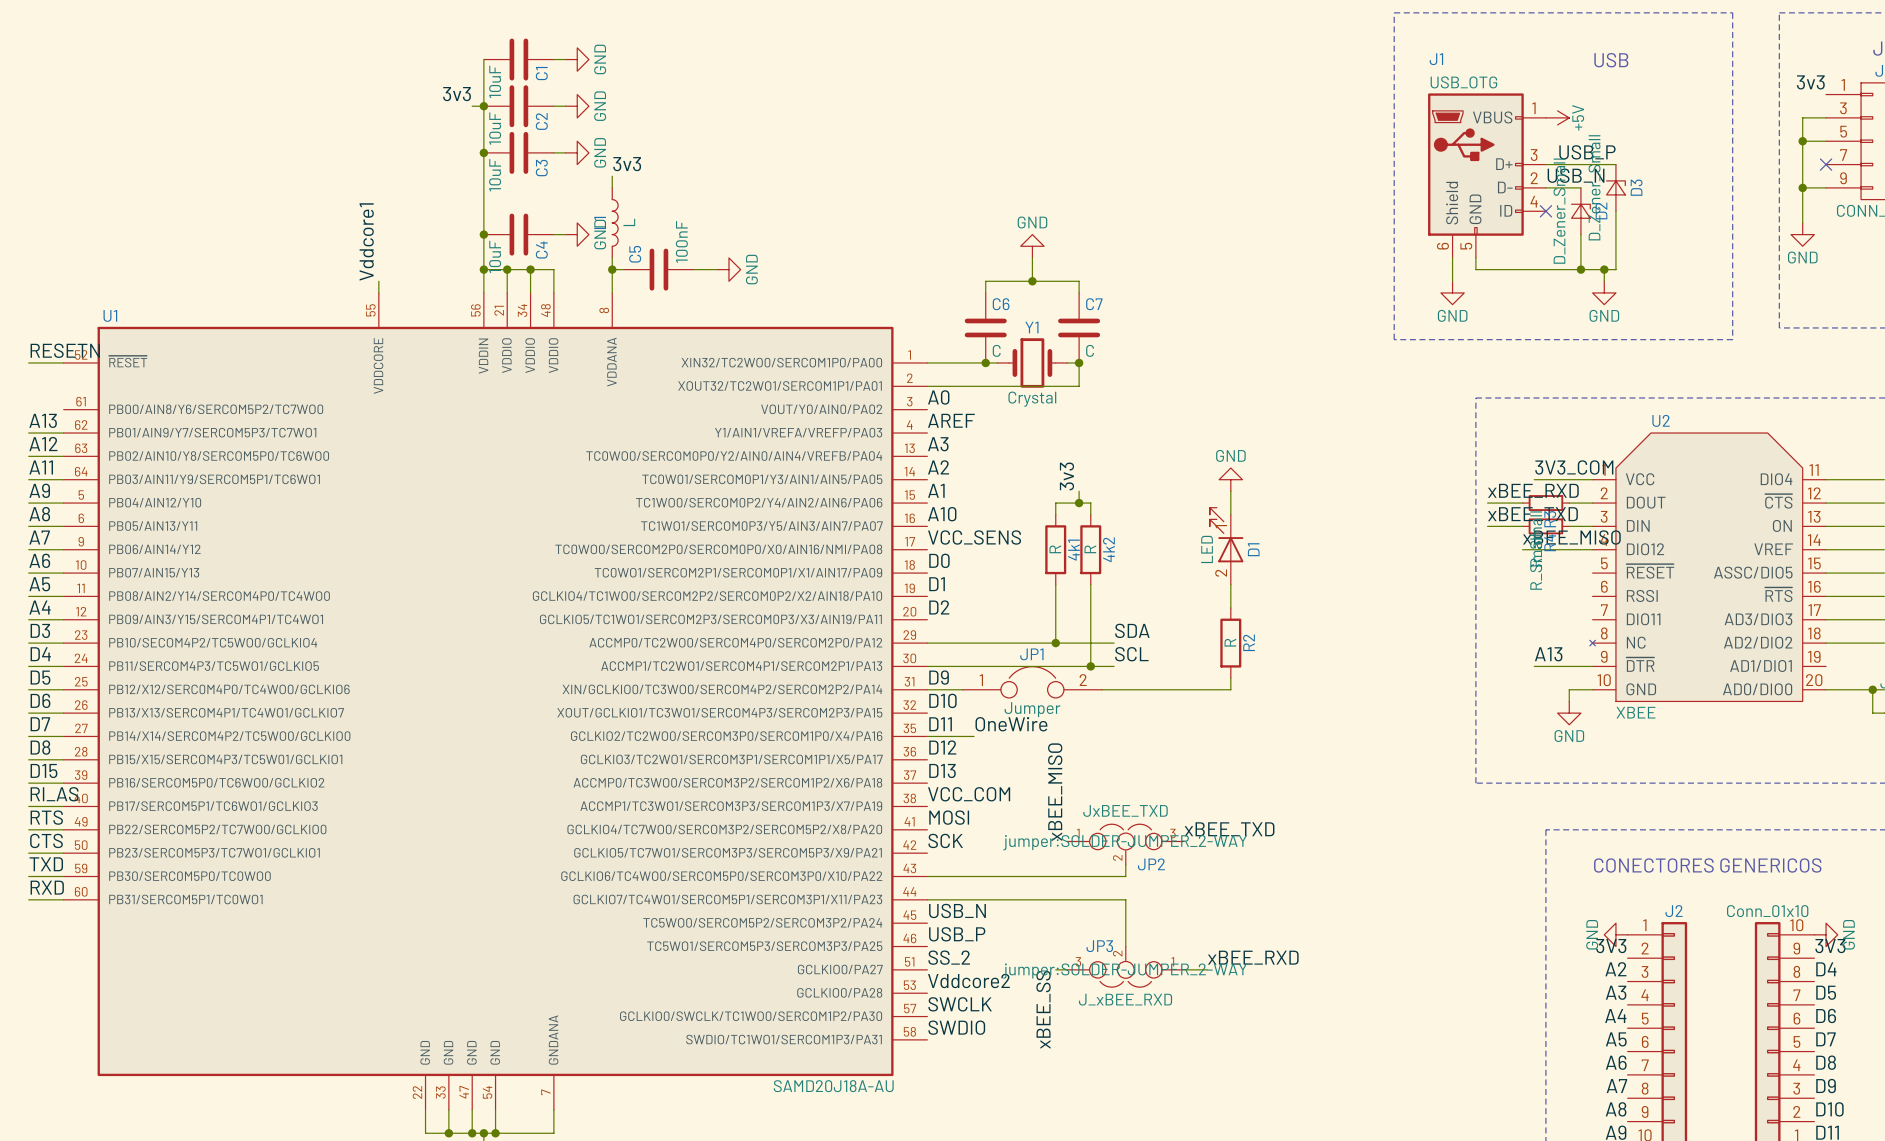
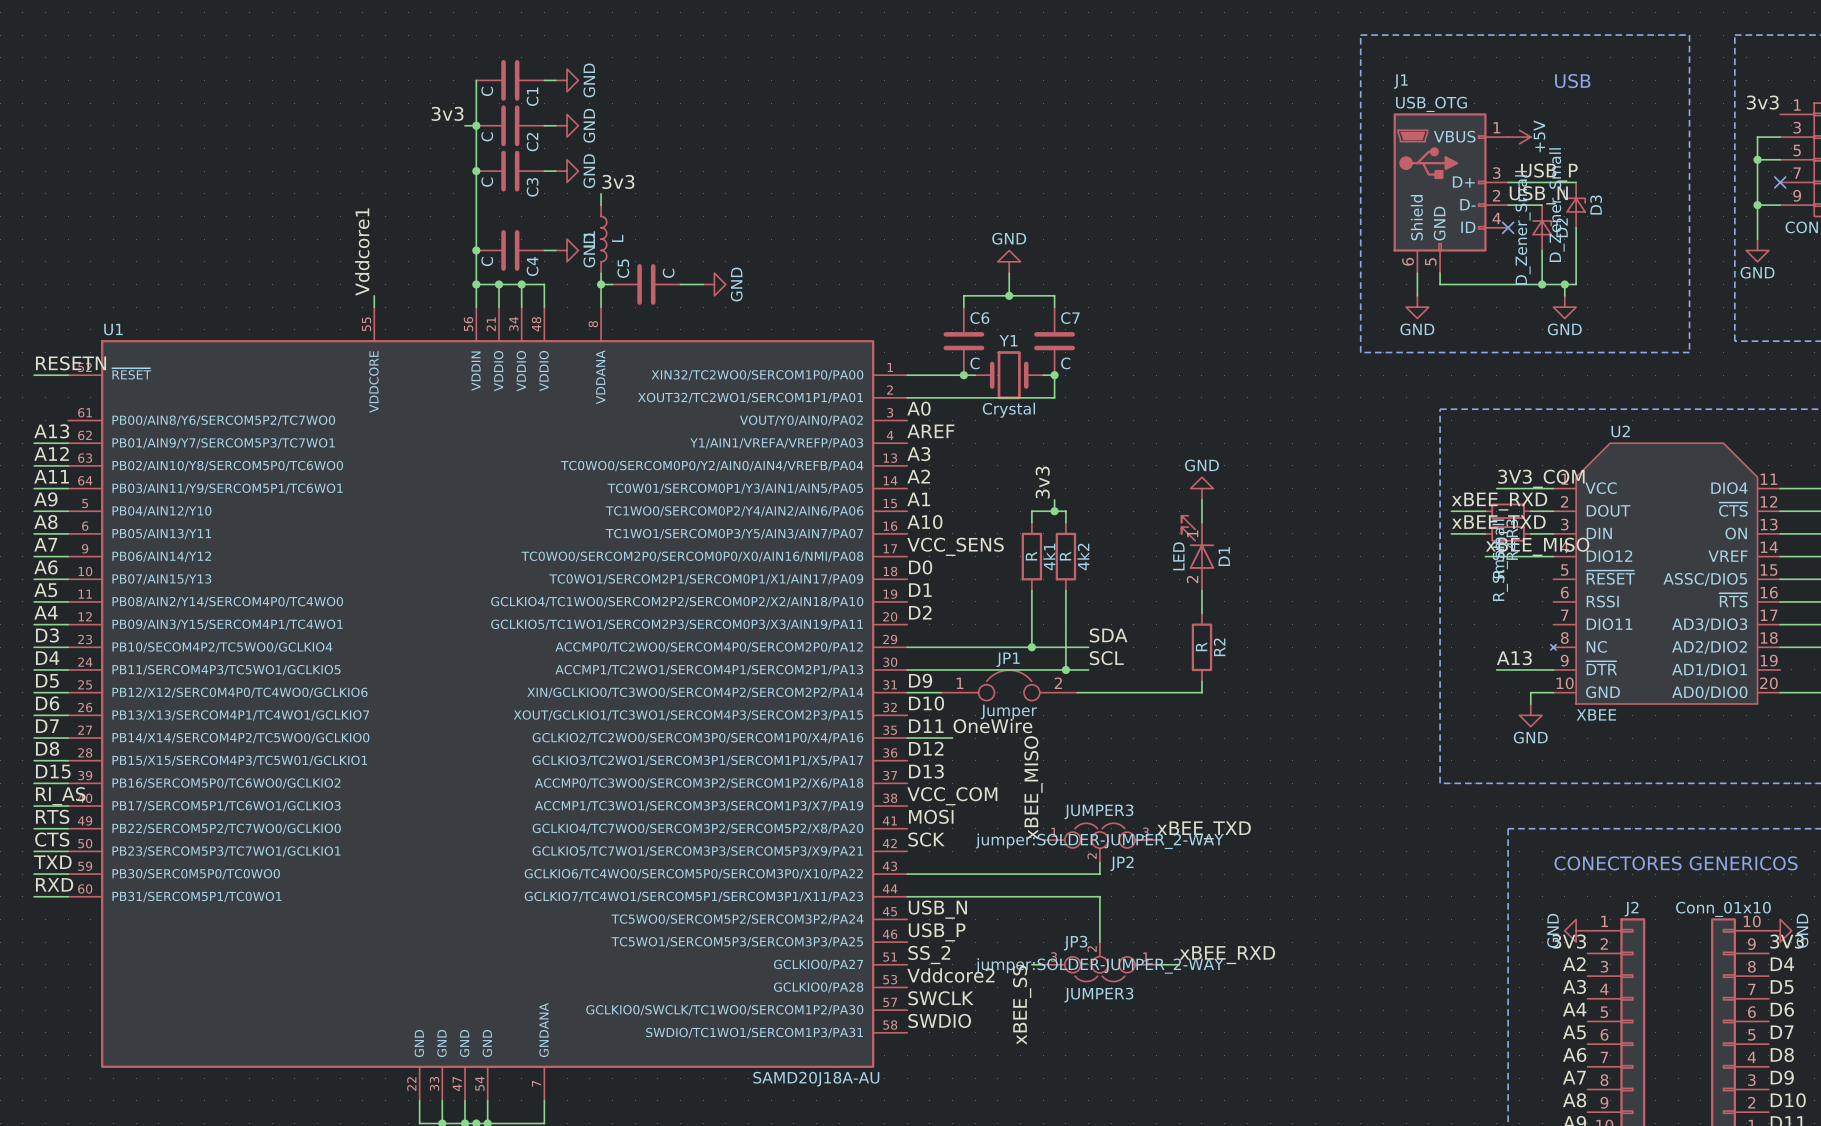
C1 value: 10uF (495, 81) -> C (487, 91)
C2 value: 10uF (495, 128) -> C (487, 136)
C3 value: 10uF (495, 175) -> C (487, 182)
C5 value: 100nF (681, 241) -> C (668, 273)
C4 value: 10uF (495, 256) -> C (487, 261)
JP2 value: JxBEE_TXD (1125, 810) -> JUMPER3 (1098, 811)
JP3 value: J_xBEE_RXD (1125, 999) -> JUMPER3 (1098, 995)

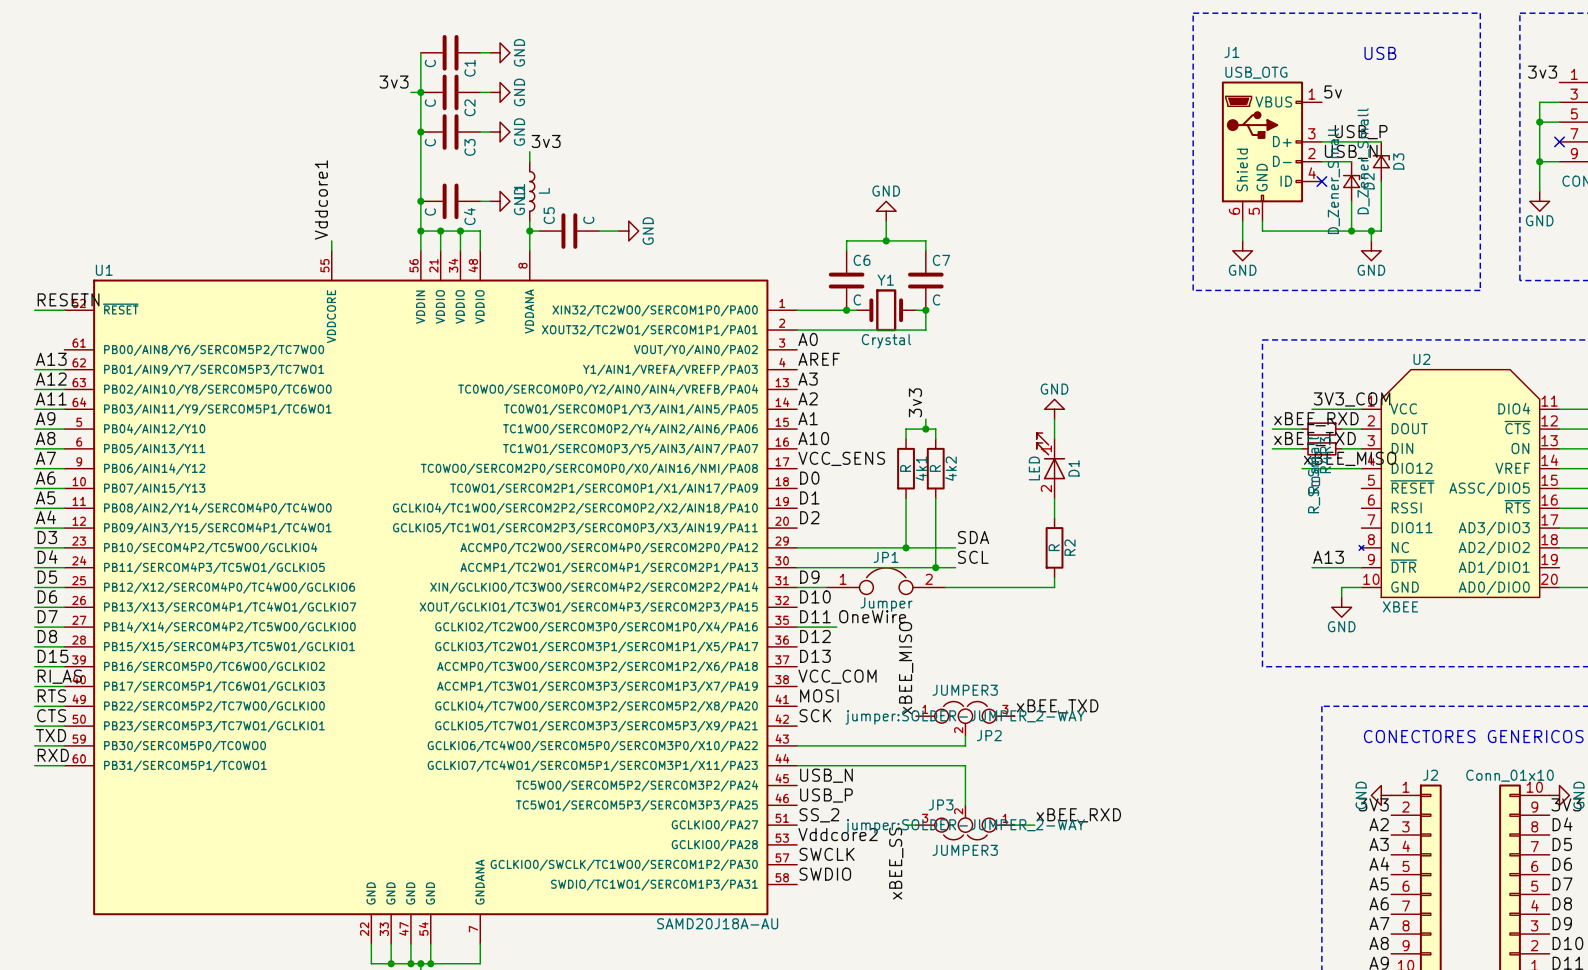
label: none -> 5v (1333, 91)
power symbol: +5V (1519, 137) -> none

